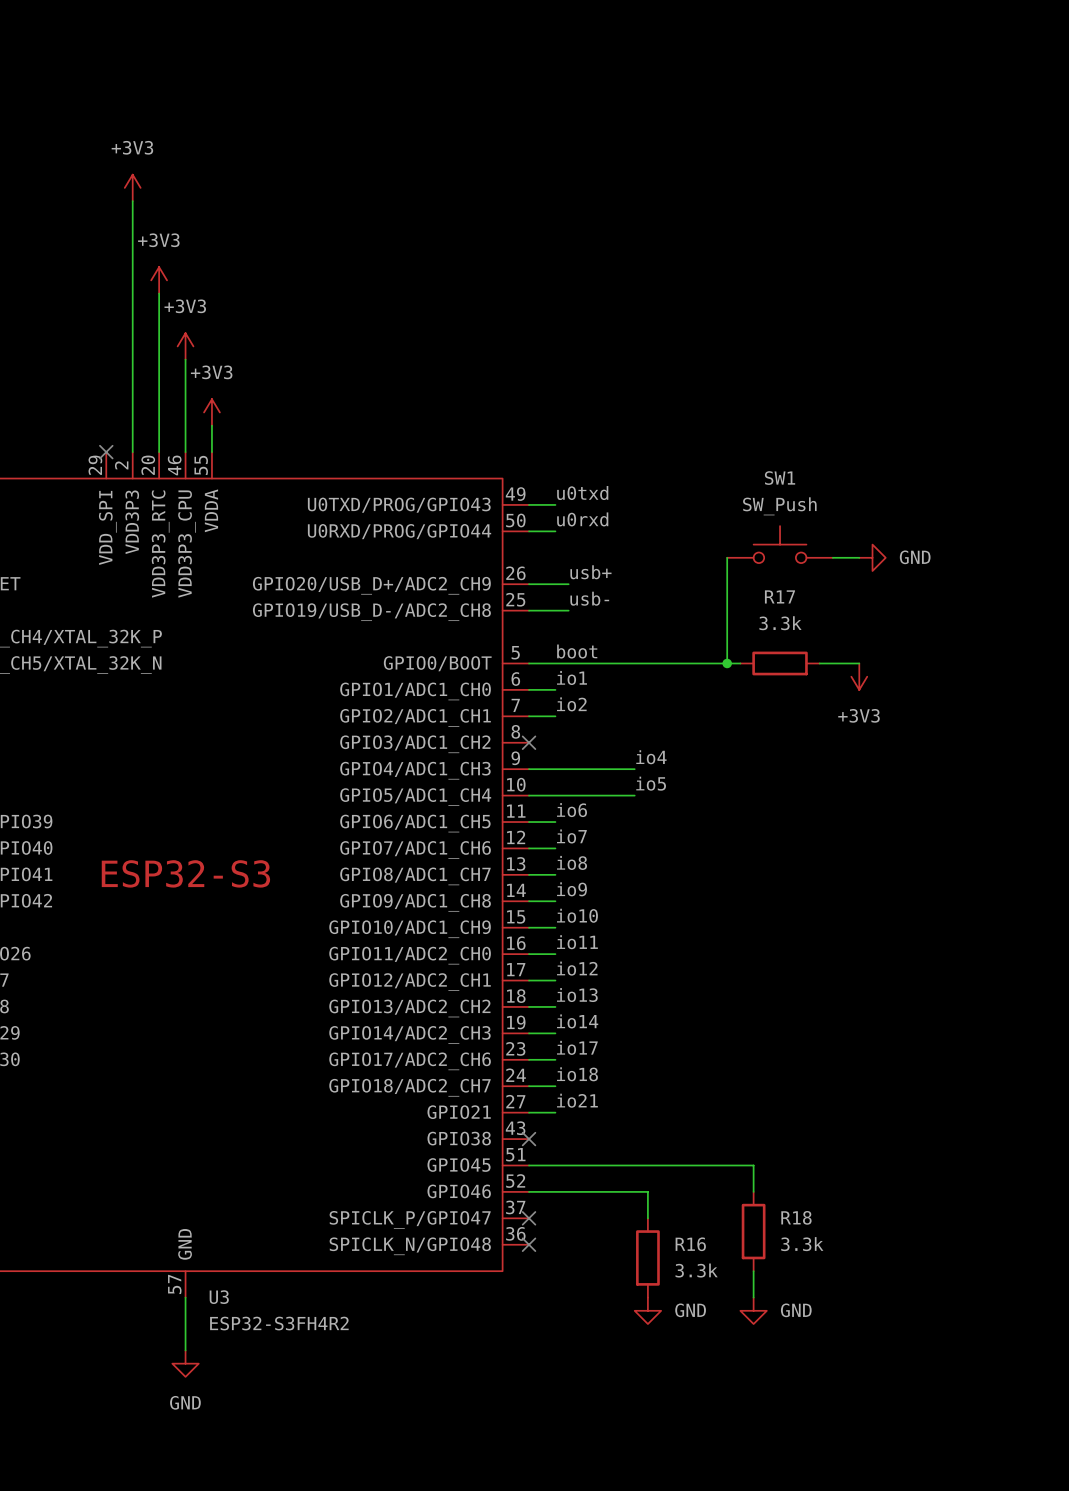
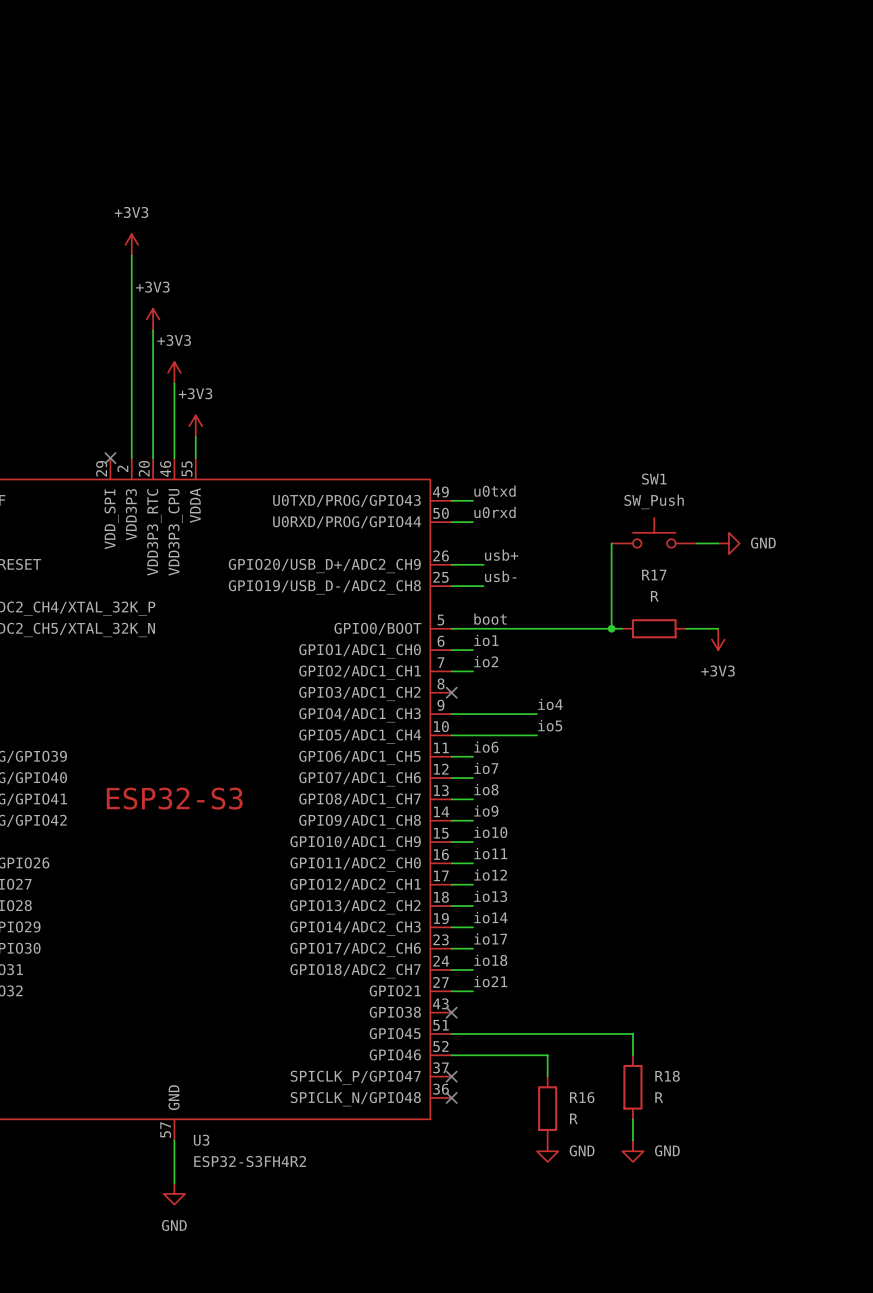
R17 value: 3.3k (780, 623) -> R (654, 596)
R18 value: 3.3k (802, 1244) -> R (659, 1097)
R16 value: 3.3k (696, 1270) -> R (573, 1118)

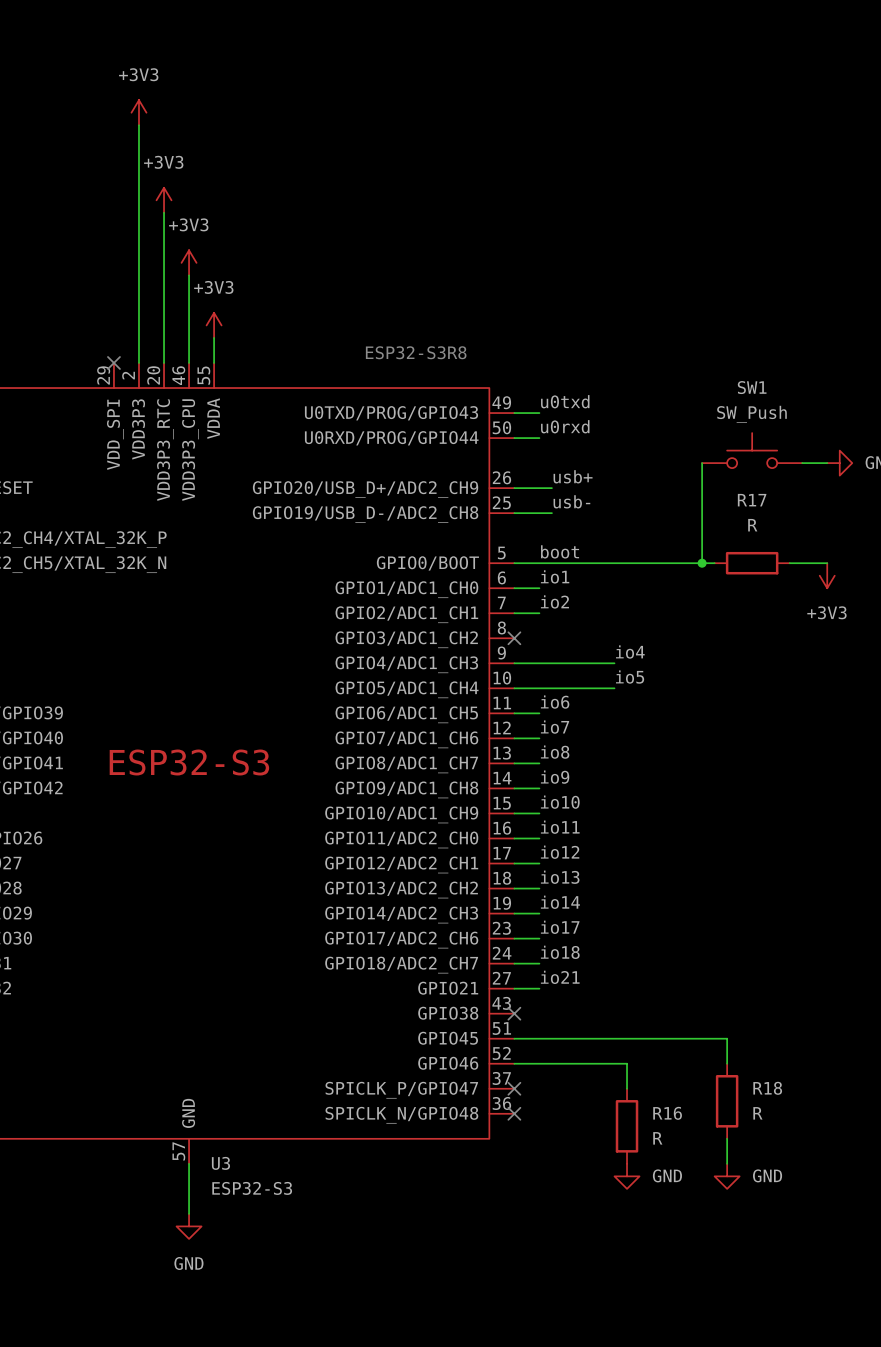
text: none -> ESP32-S3R8 (416, 352)
U3 value: ESP32-S3FH4R2 (250, 1161) -> ESP32-S3 (252, 1188)

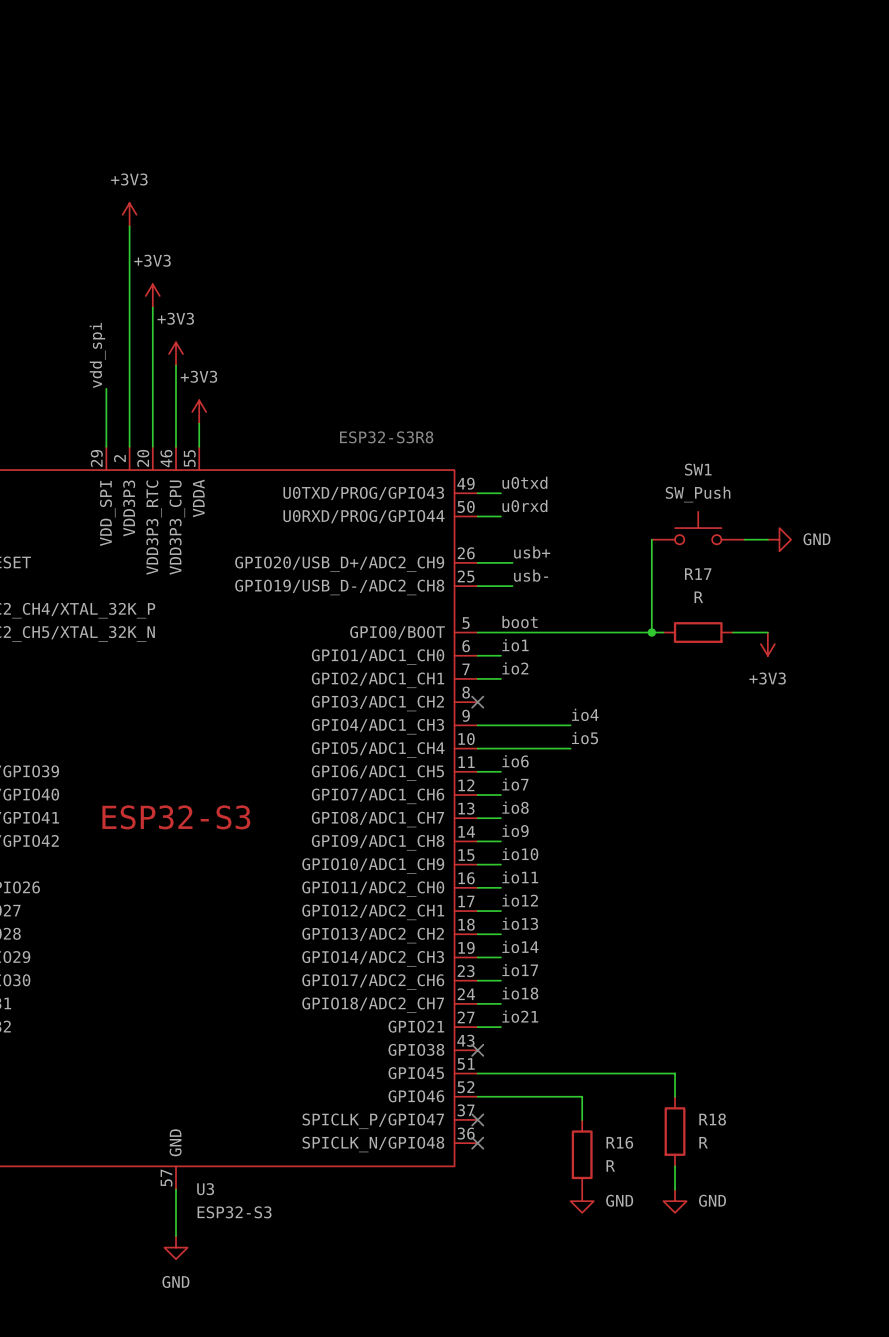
label: none -> vdd_spi (97, 355)
wire: none -> (106, 388) (106, 446)
no-connect mark: (113, 362) -> none

